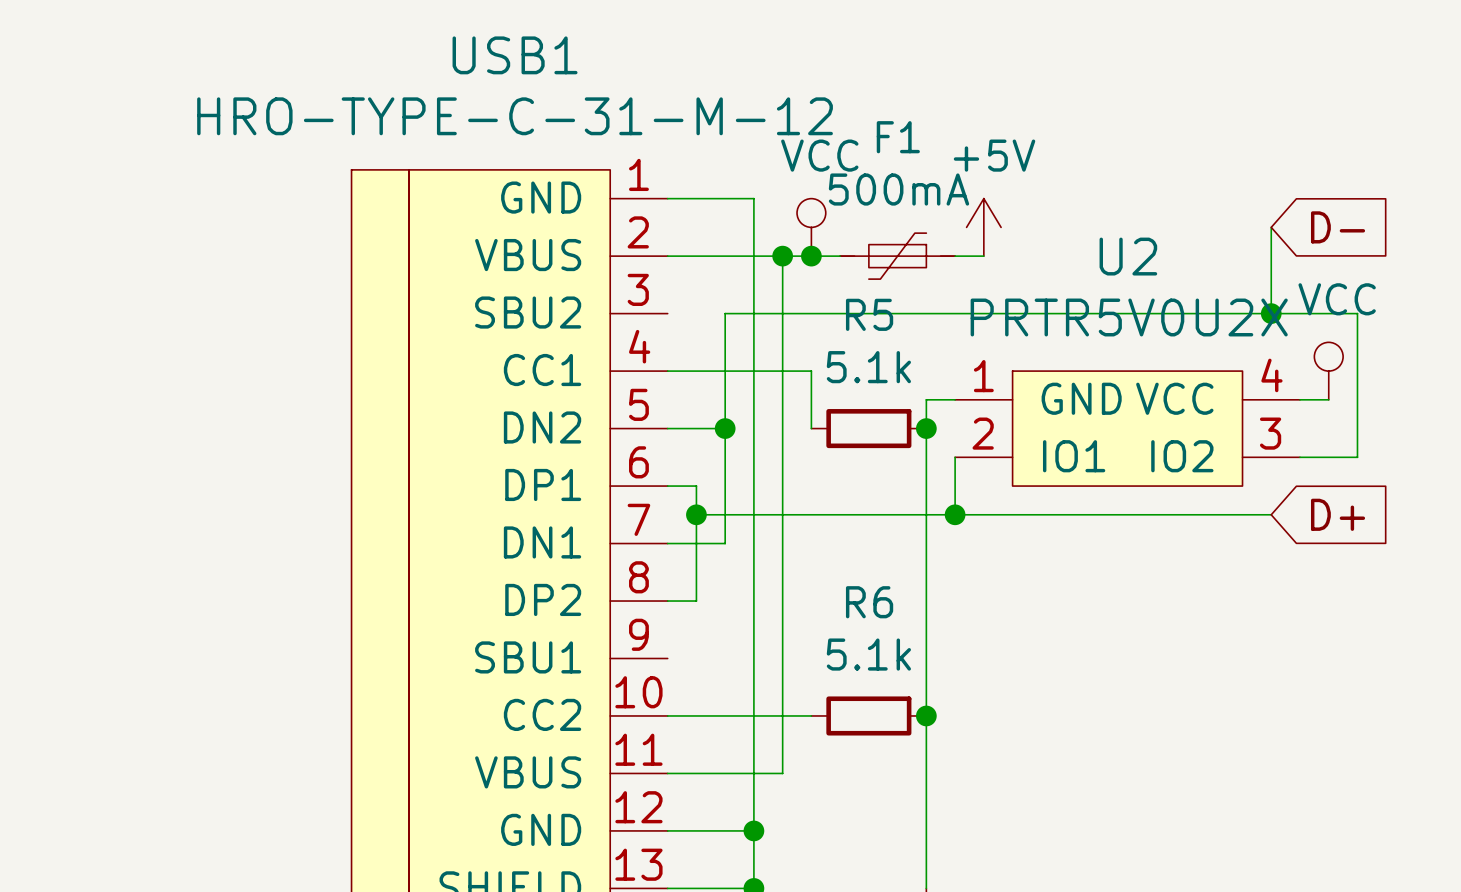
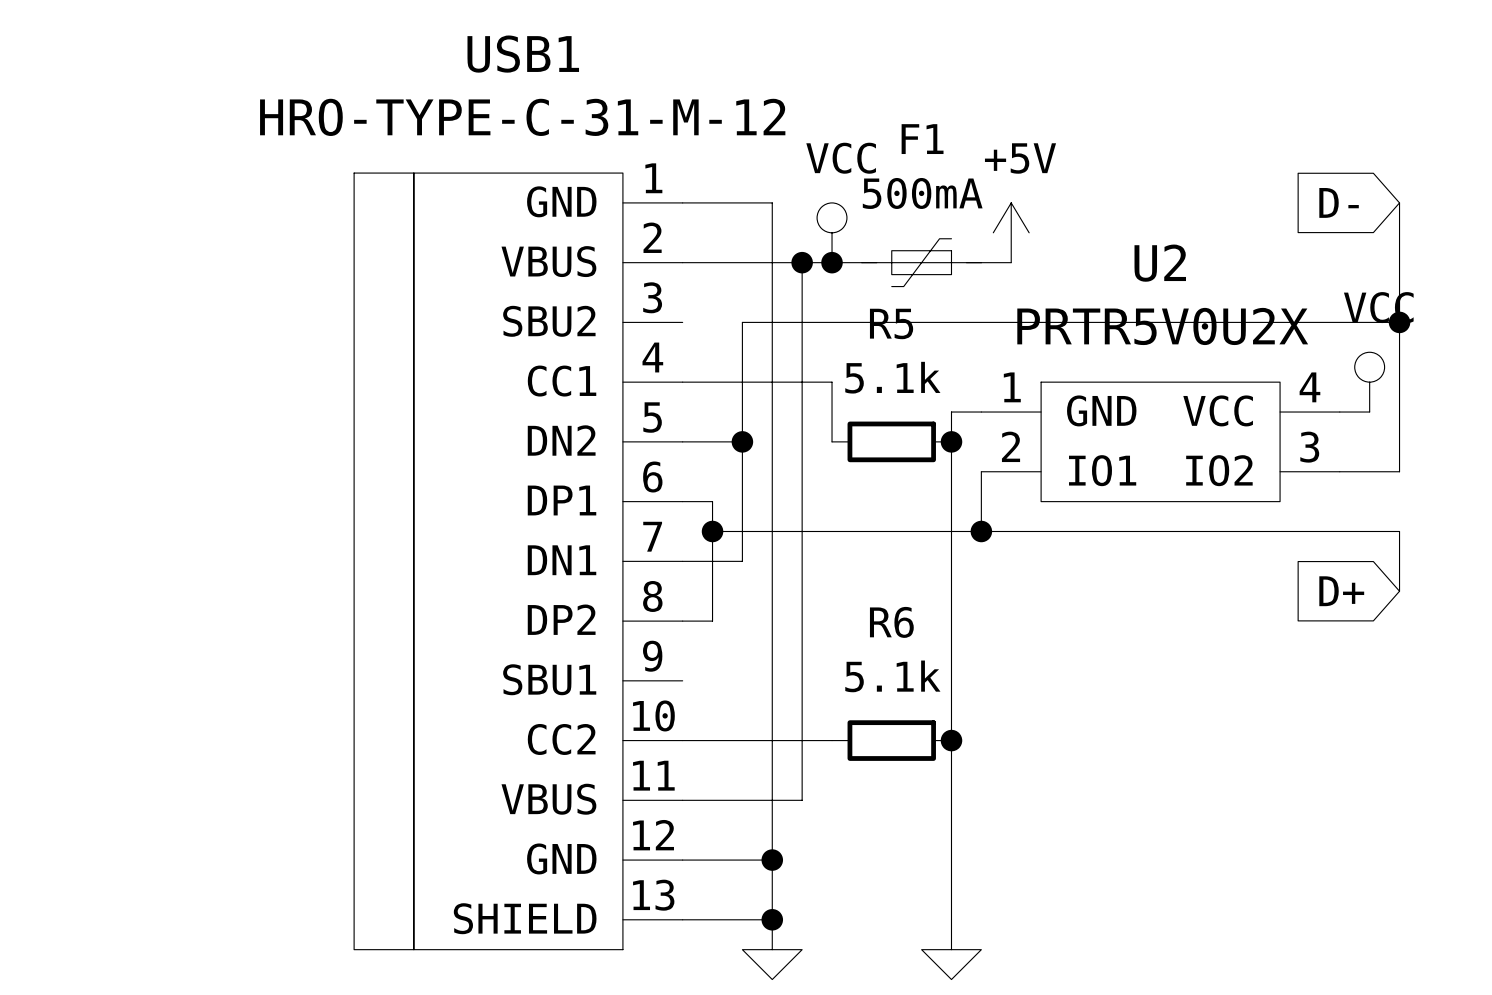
wire: none -> (1399, 202) (1399, 322)
wire: (1271, 227) (1271, 313) -> none
global label rotation: 0° (1338, 227) -> 180° (1339, 202)
junction position: (1271, 313) -> (1399, 322)
wire: none -> (1309, 531) (1399, 531) (1399, 591)
global label rotation: 0° (1338, 514) -> 180° (1341, 591)

